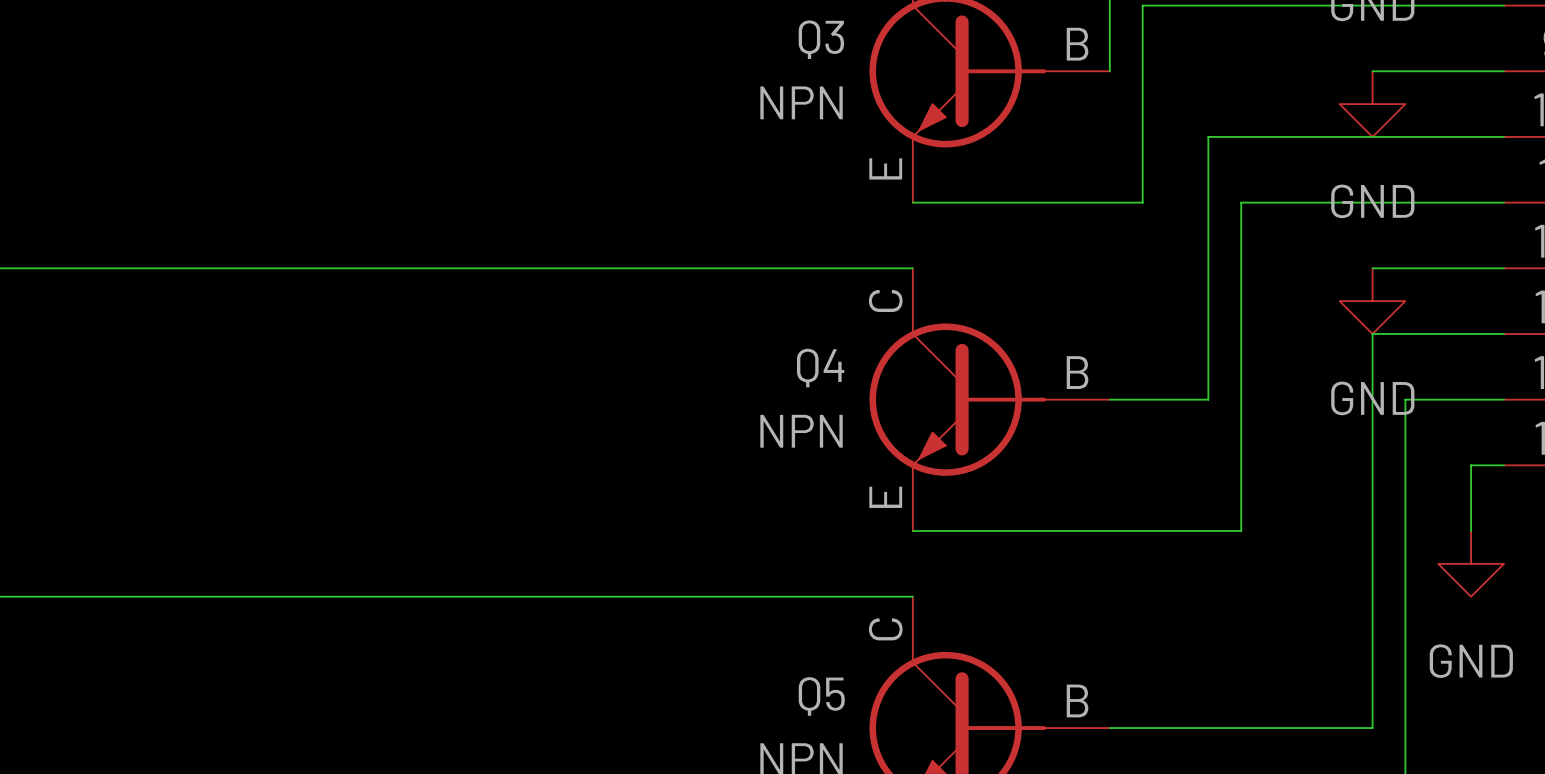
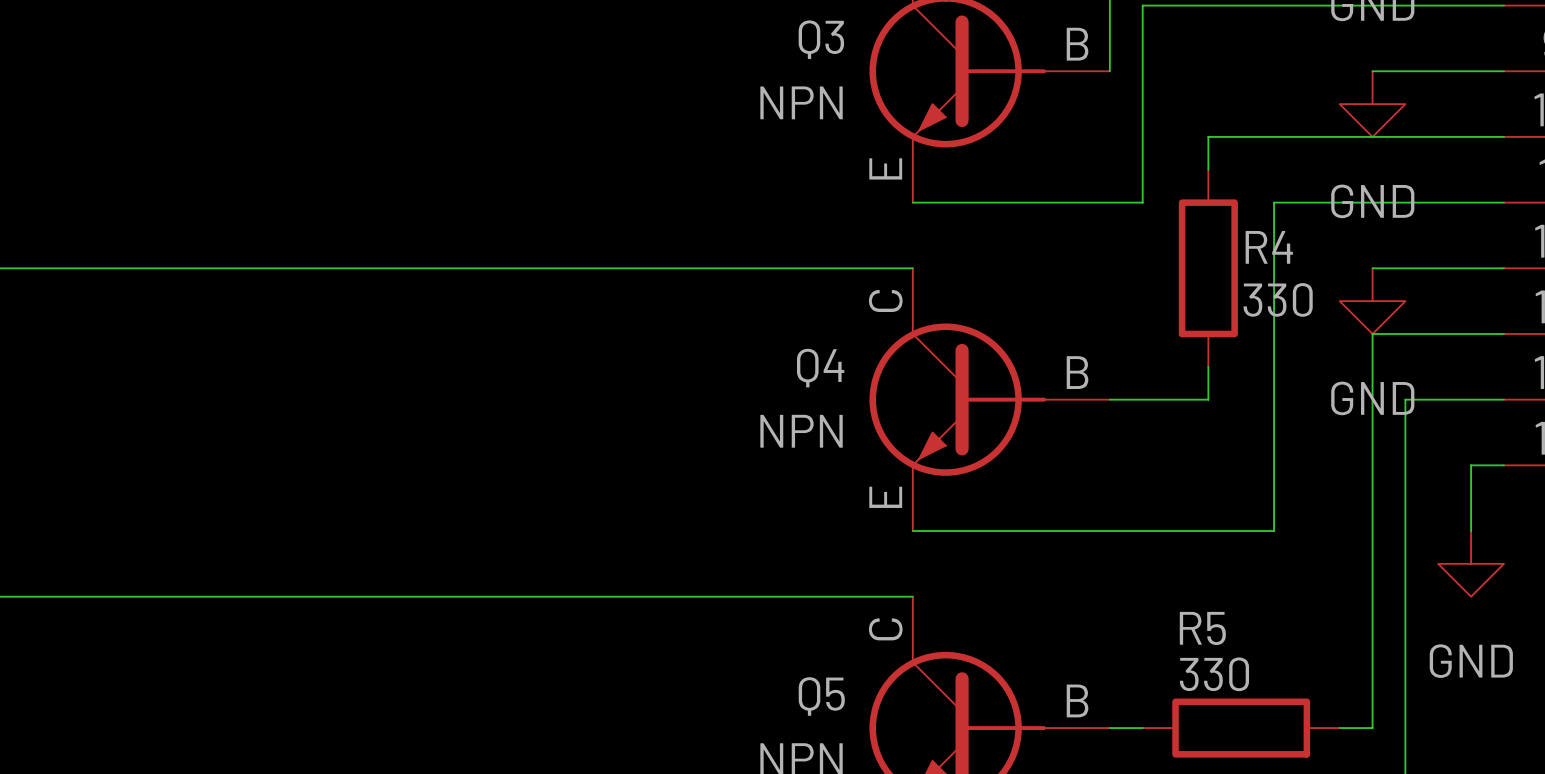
wire: (1208, 169) (1208, 366) -> none
wire: (1274, 202) (1241, 202) (1241, 531) -> (1274, 202) (1274, 531) (1241, 531)
R4: none -> 330 (1208, 268)
wire: (1142, 728) (1339, 728) -> none
R5: none -> 330 (1241, 728)

